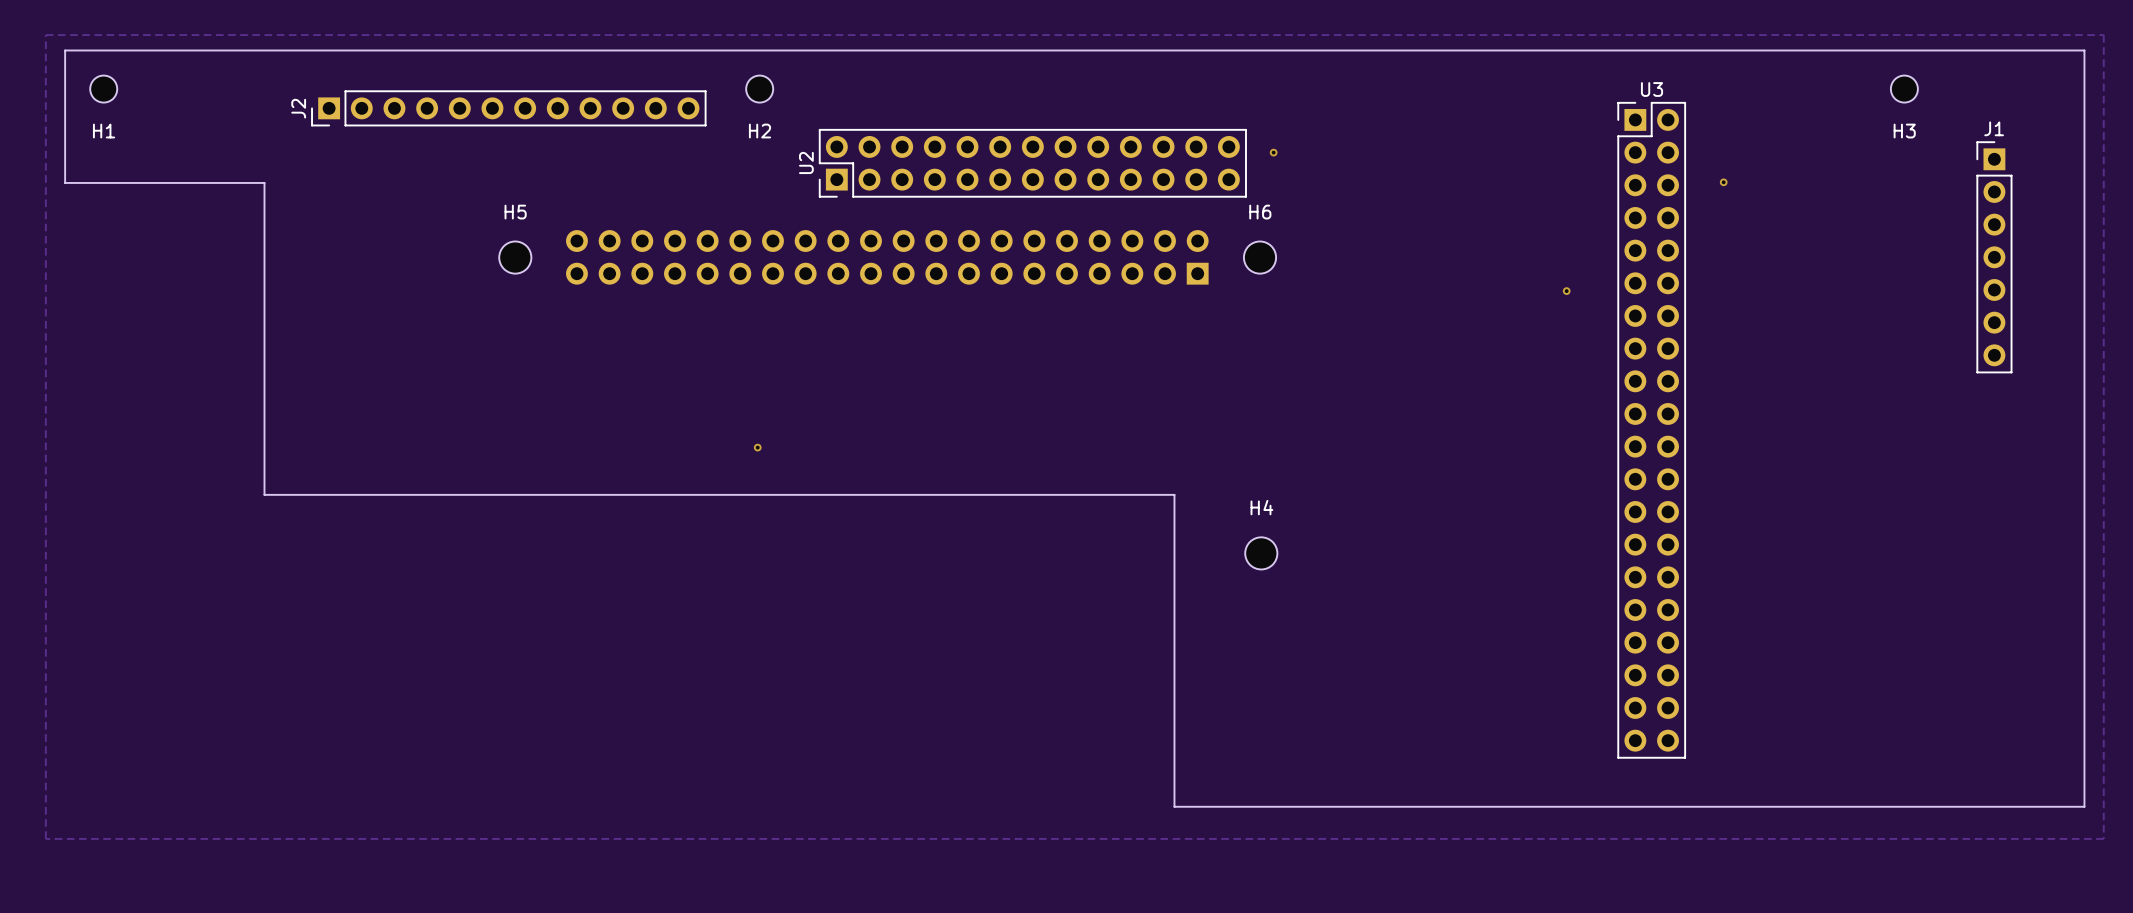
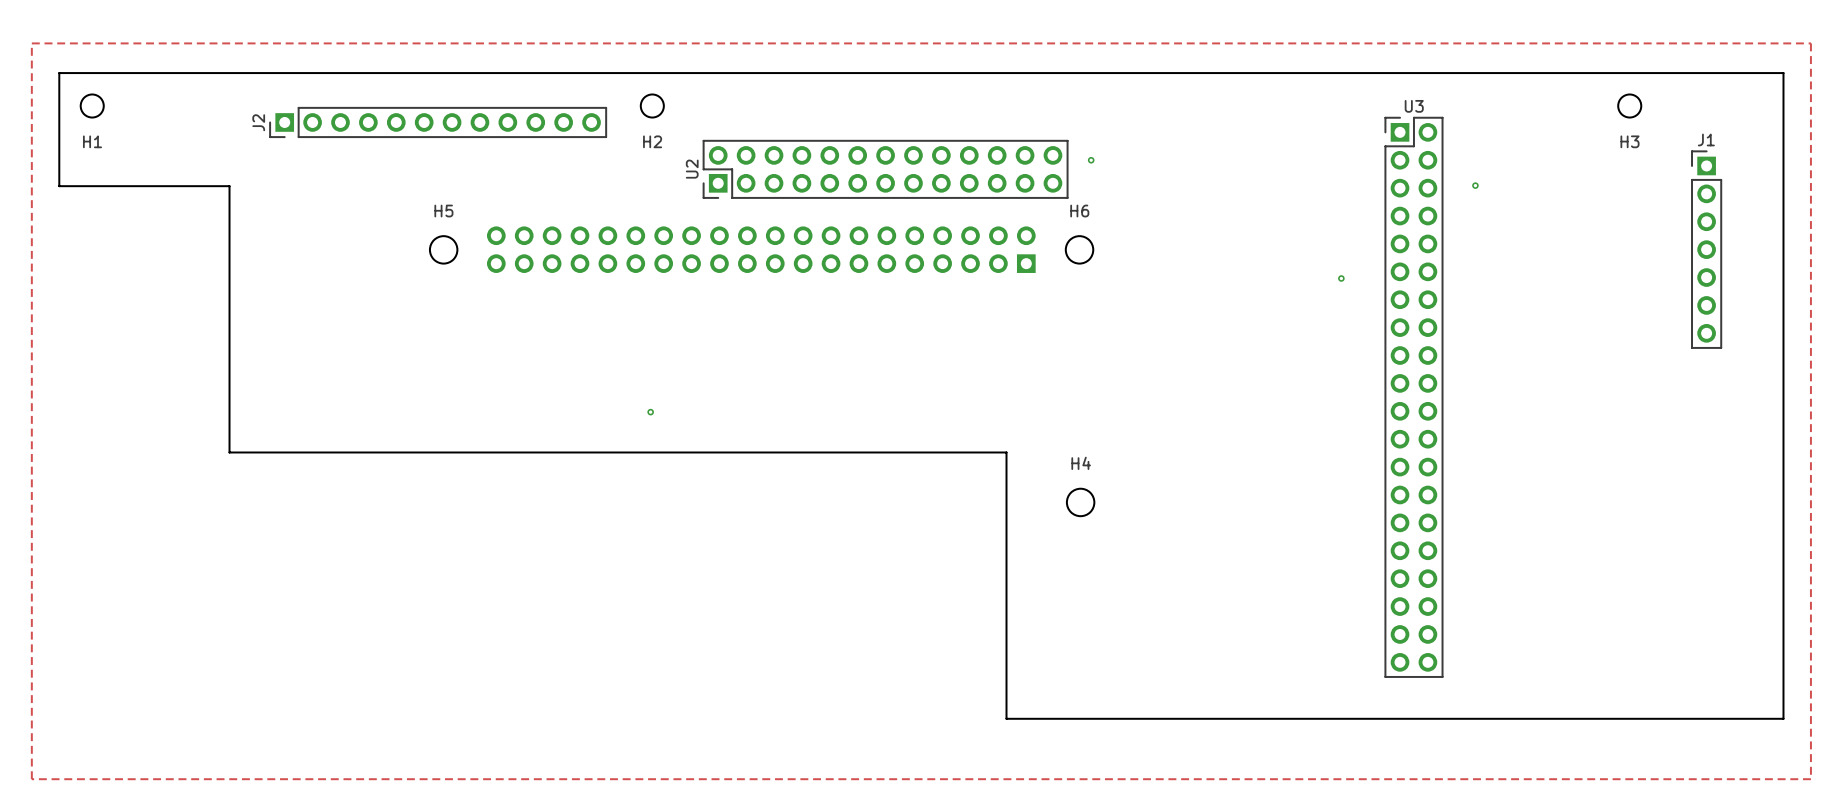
zone outline: (45, 35) (2103, 35) (2103, 838) (45, 838) (45, 35) -> (31, 43) (31, 779) (1810, 779) (1810, 43) (31, 43)

